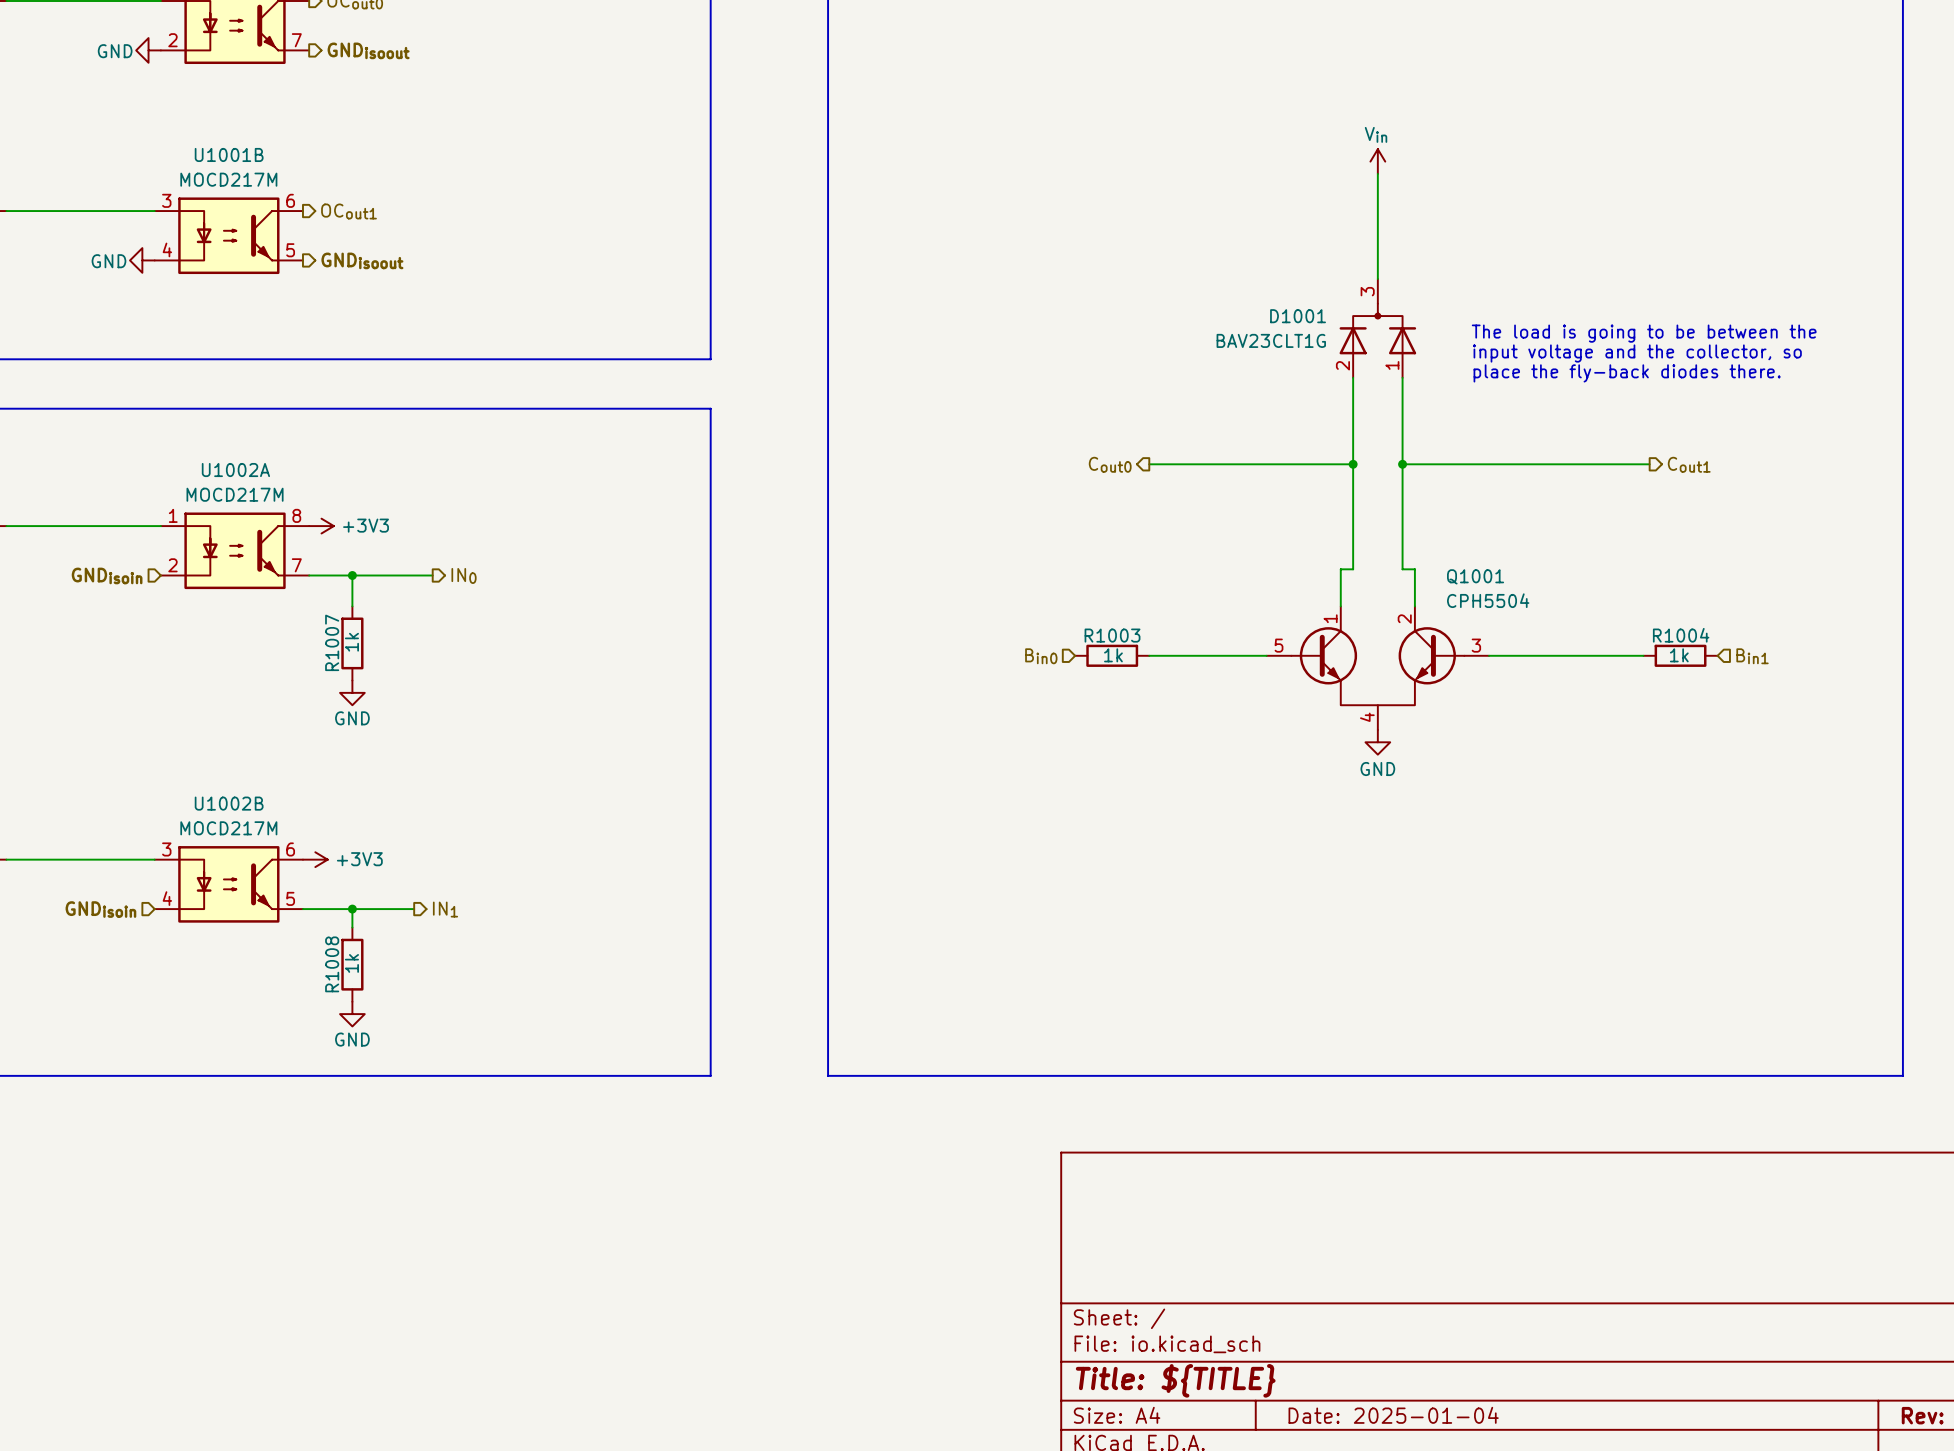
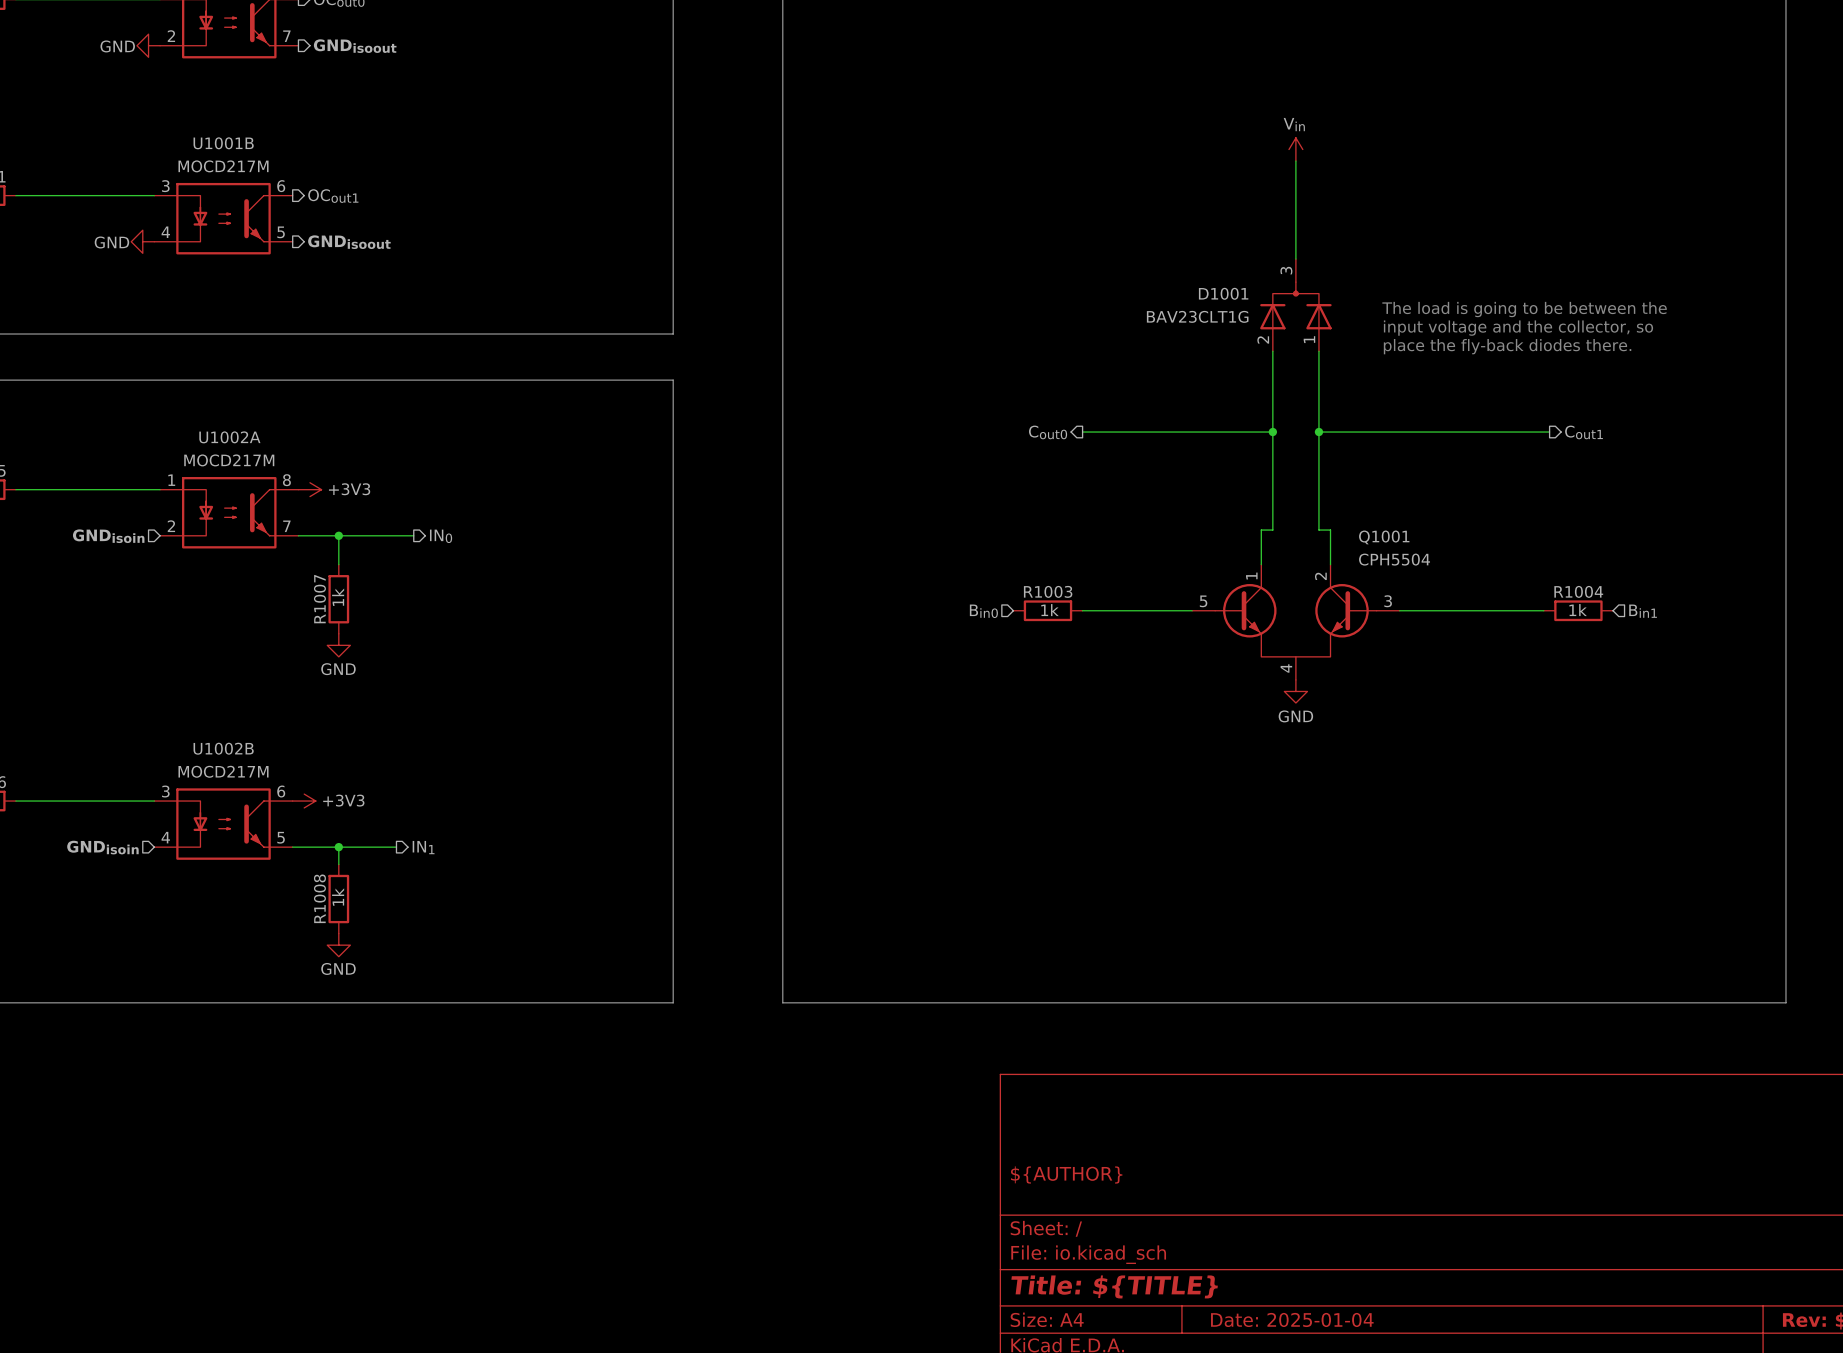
title block: none -> ${AUTHOR} (1066, 1175)

